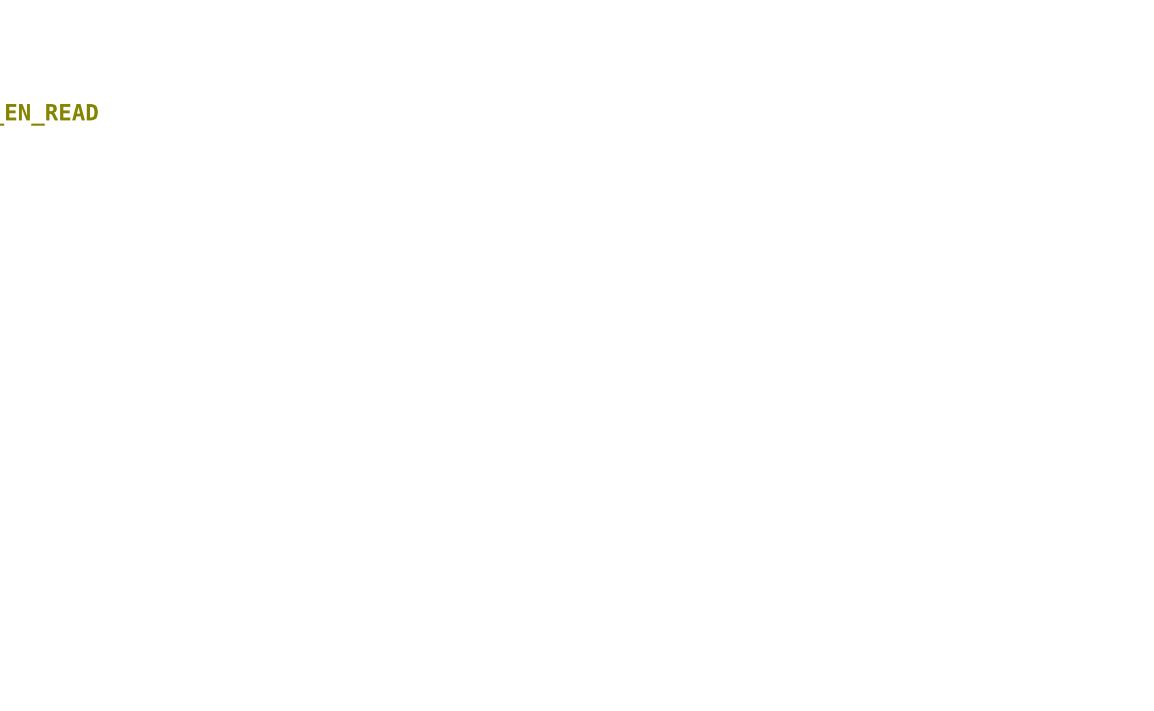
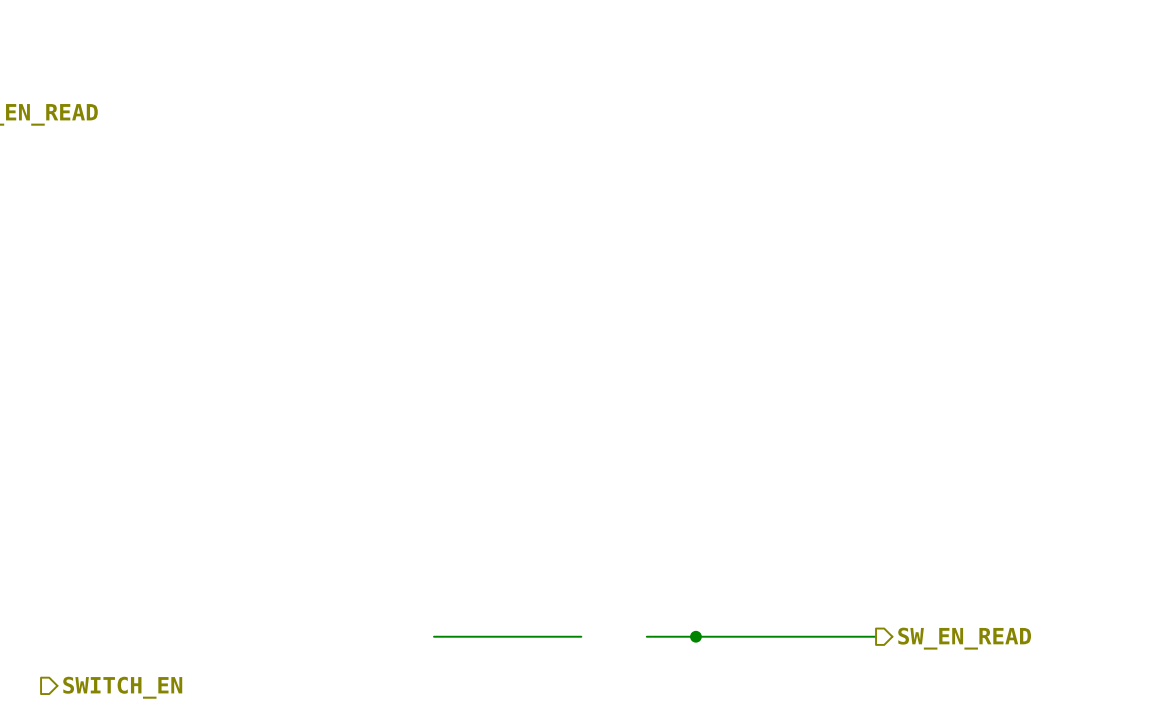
wire: none -> (433, 636) (581, 636)
wire: none -> (646, 636) (876, 636)
junction: none -> (695, 636)
hierarchical label: none -> SW_EN_READ (964, 638)
hierarchical label: none -> SWITCH_EN (122, 687)

